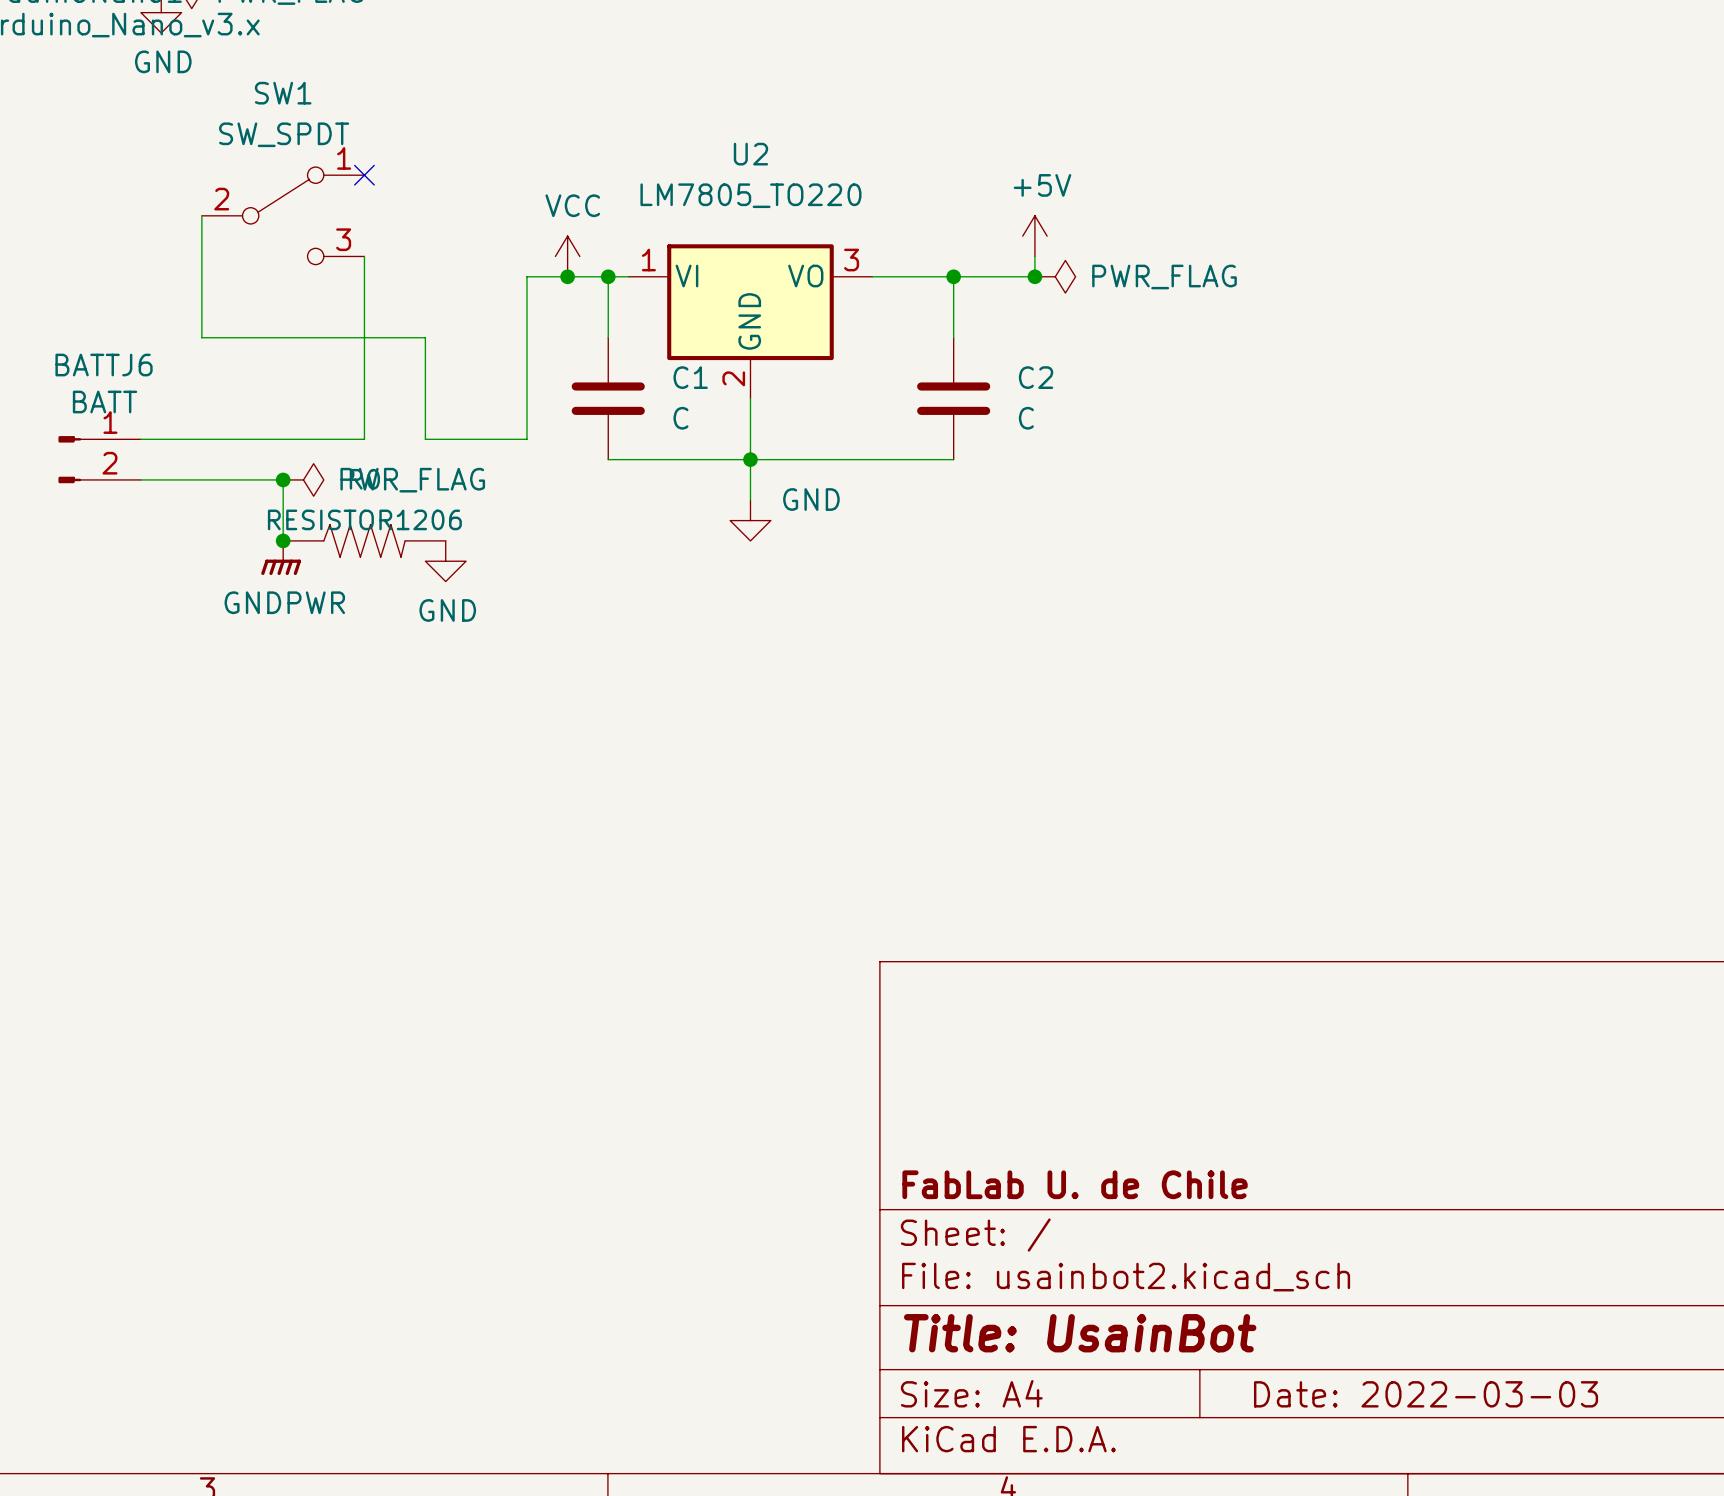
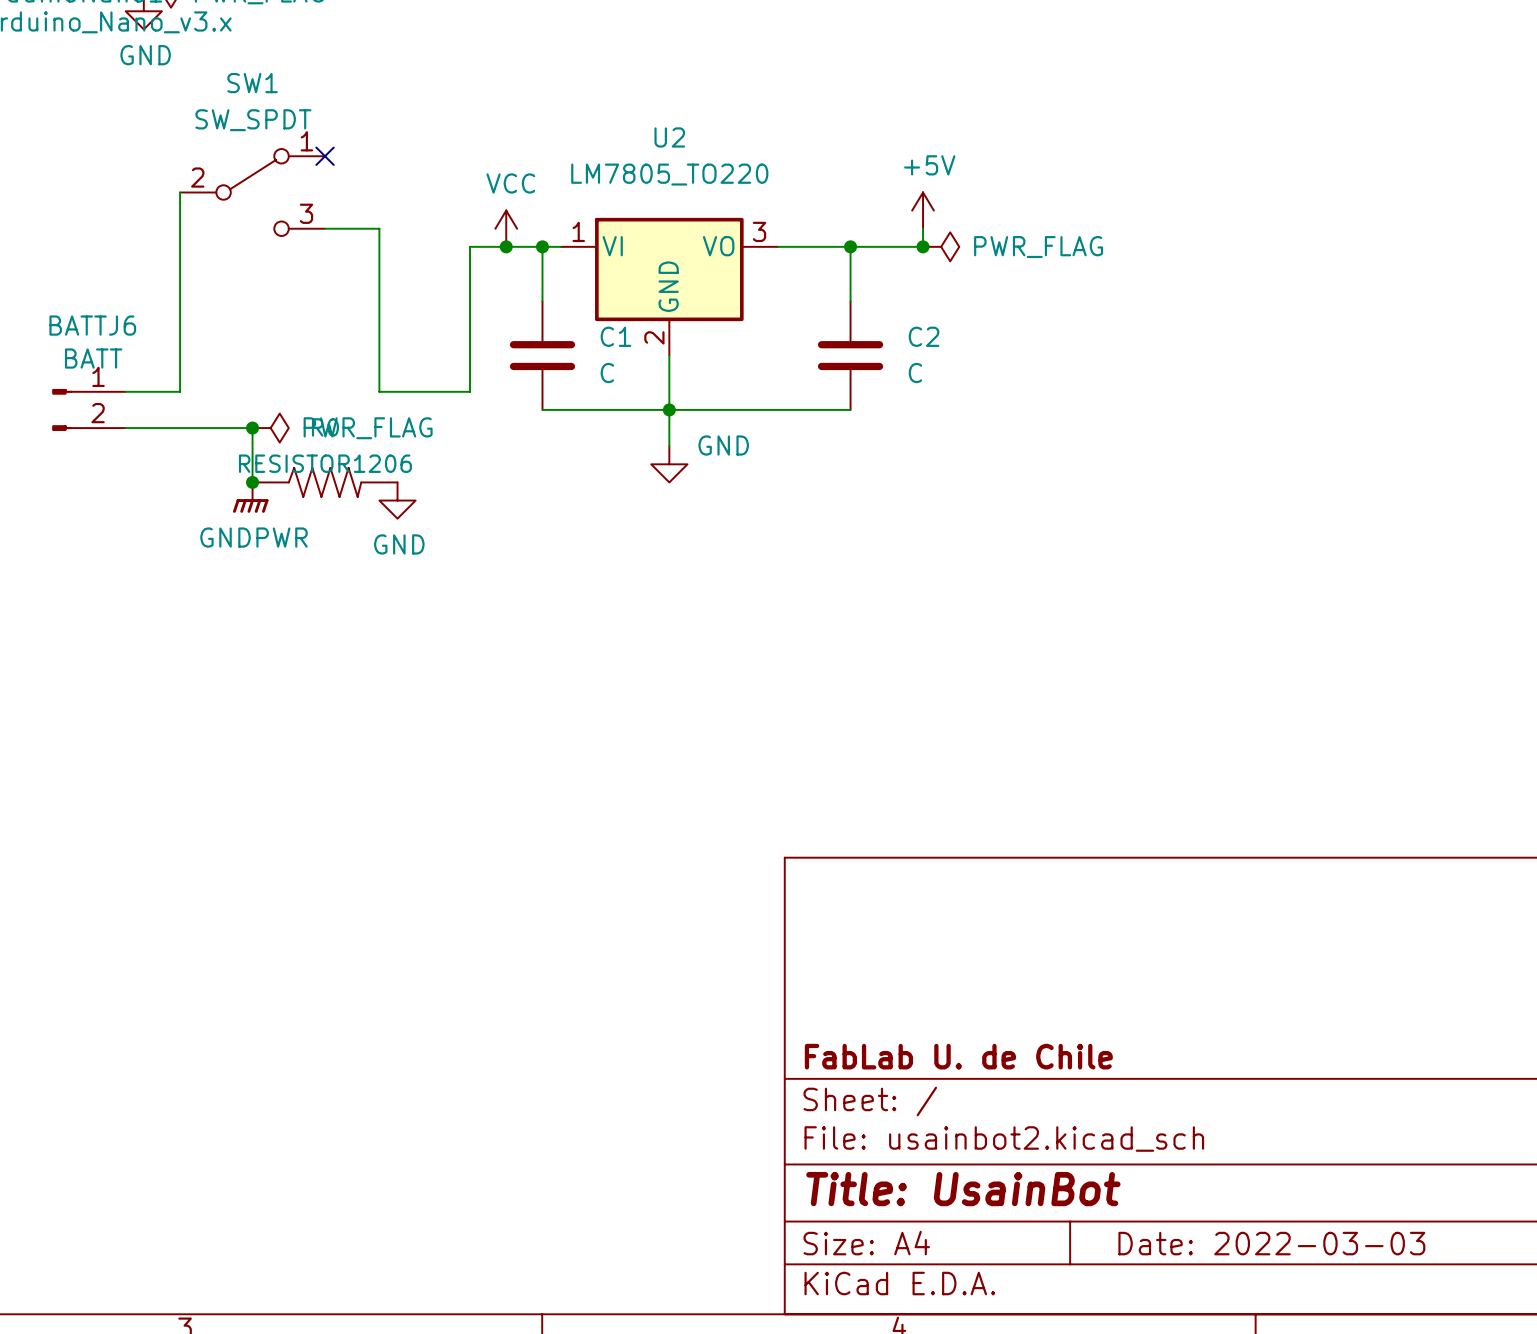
wire: (364, 256) (364, 439) (201, 439) -> (180, 301) (180, 391)
wire: (201, 337) (425, 337) -> (325, 228) (379, 228) (379, 301)

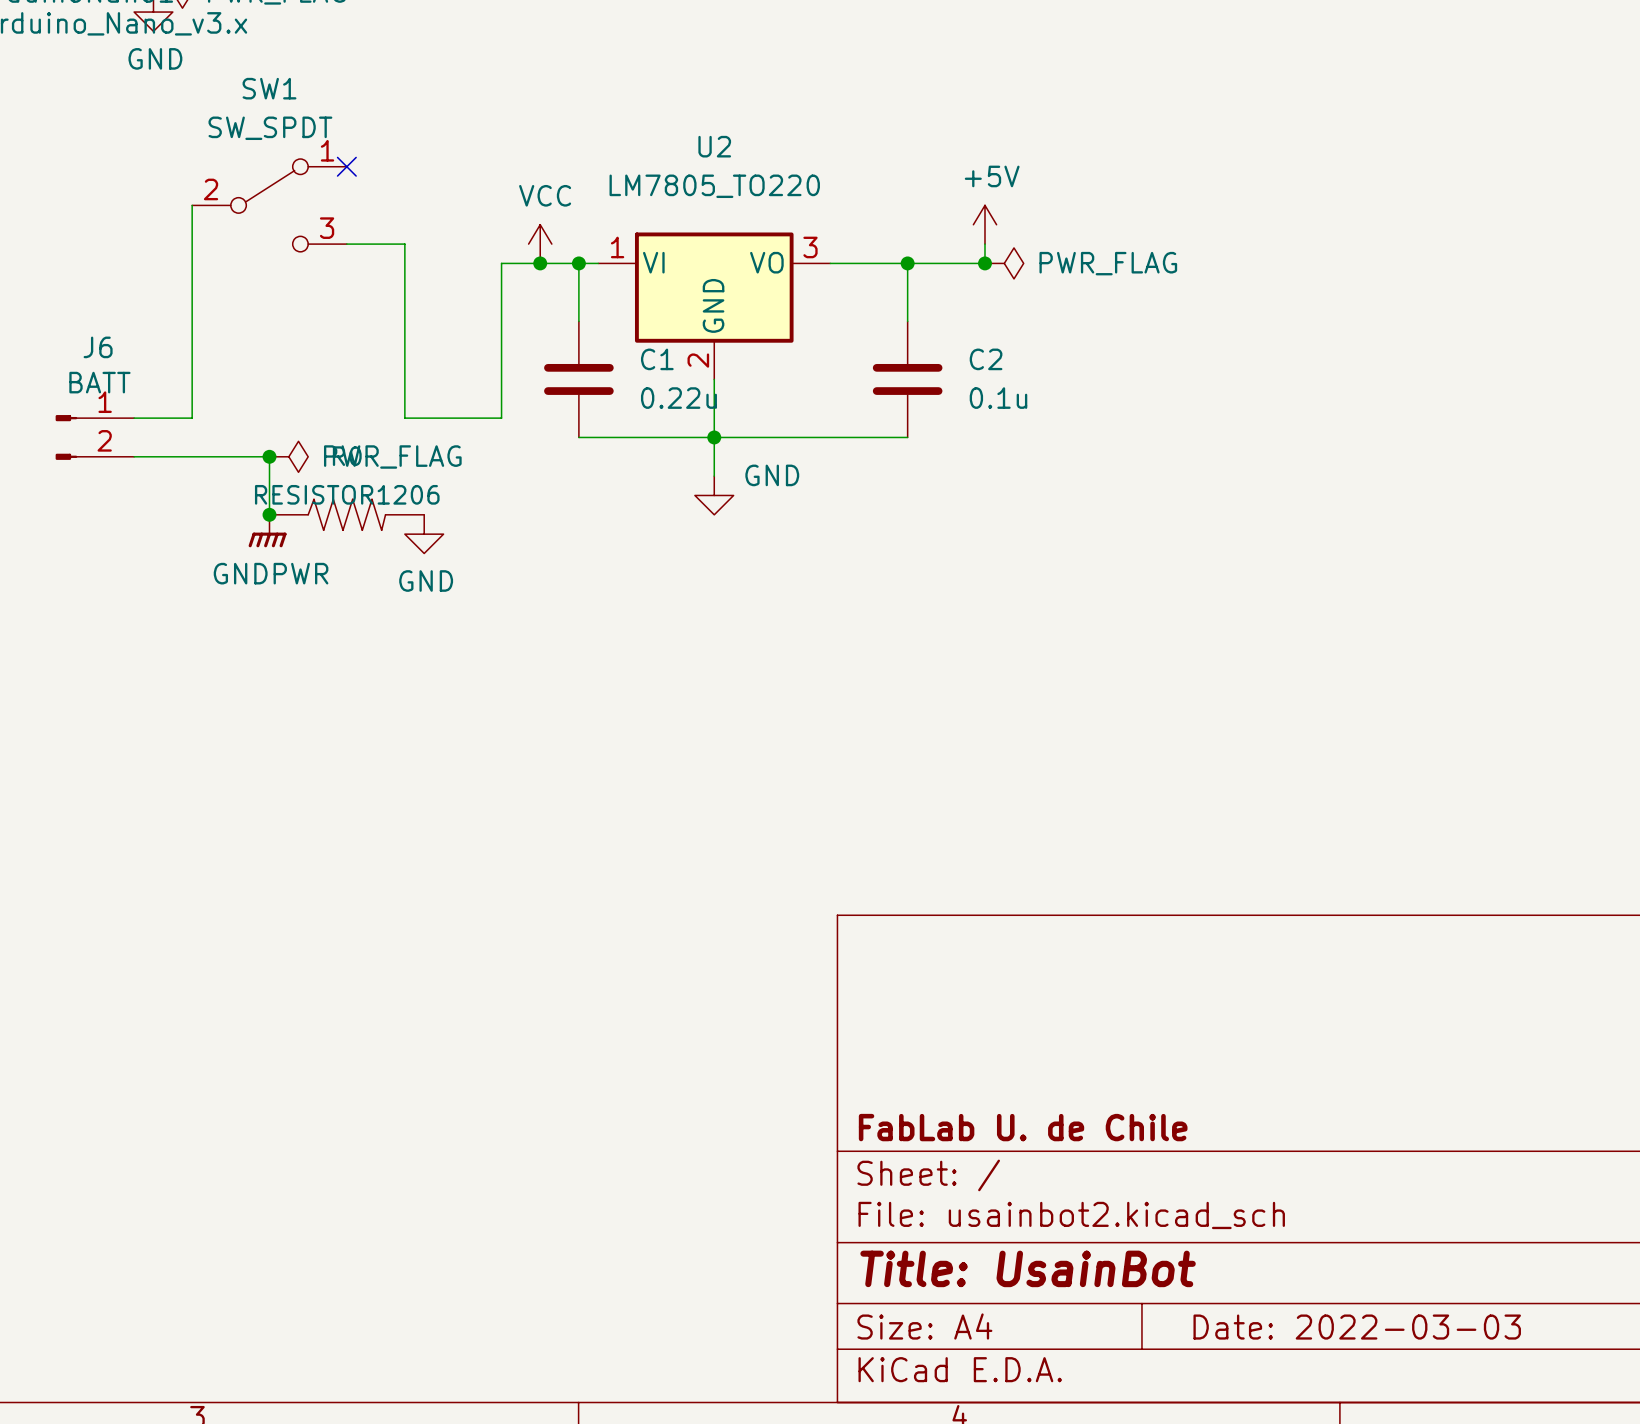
BATTJ6 name: BATTJ6 (92, 325) -> J6 (98, 347)
C1 value: C (607, 373) -> 0.22u (678, 398)
C2 value: C (915, 373) -> 0.1u (998, 398)

